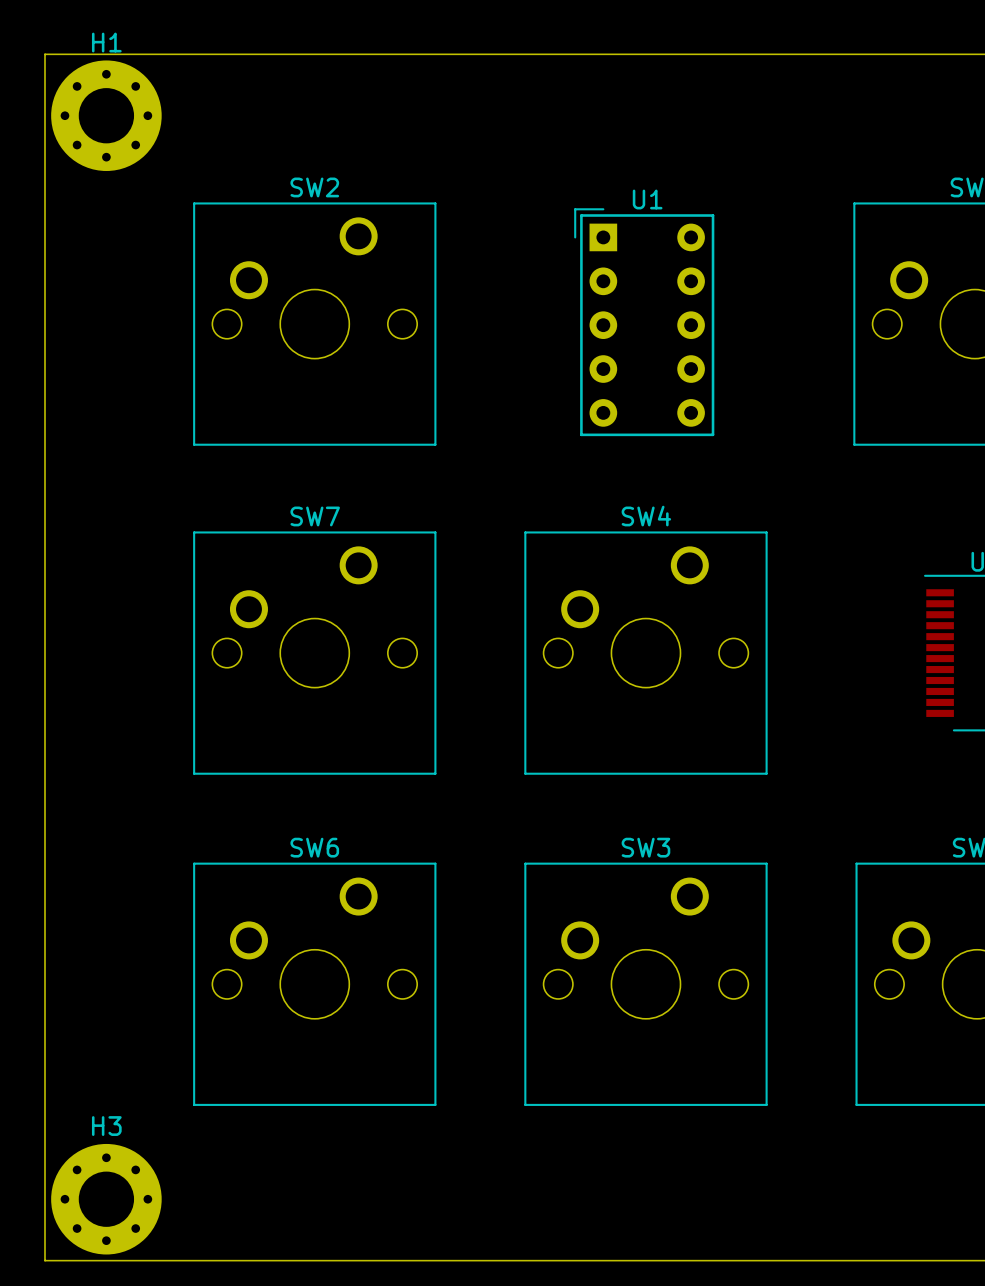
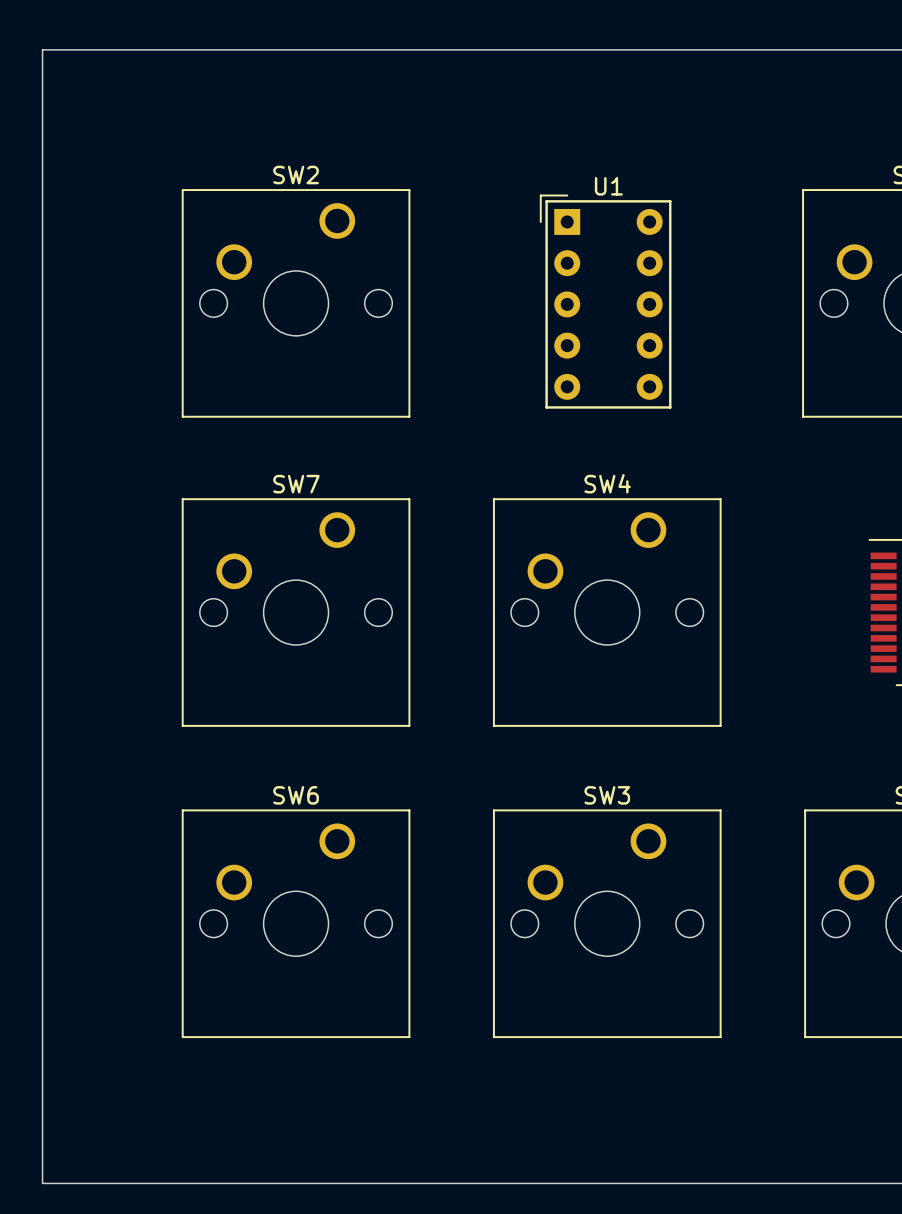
H1: (106, 115) -> none
H3: (106, 1199) -> none

